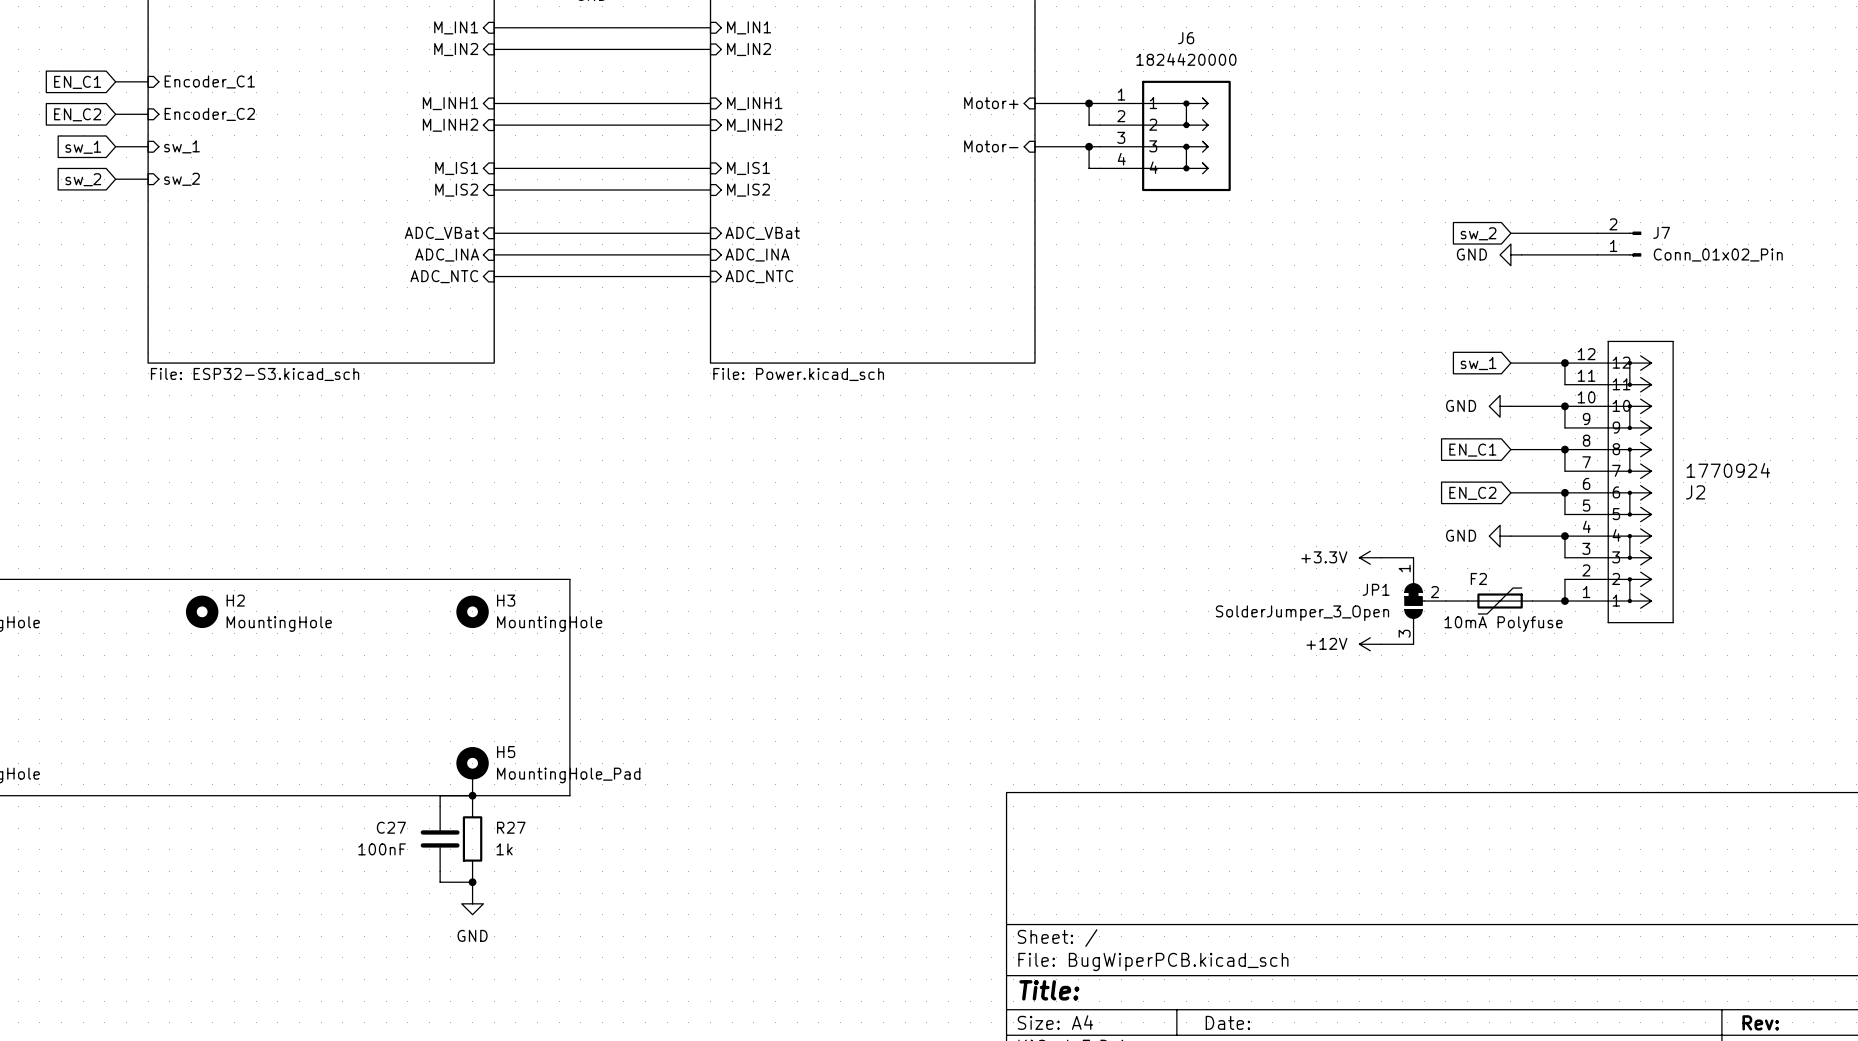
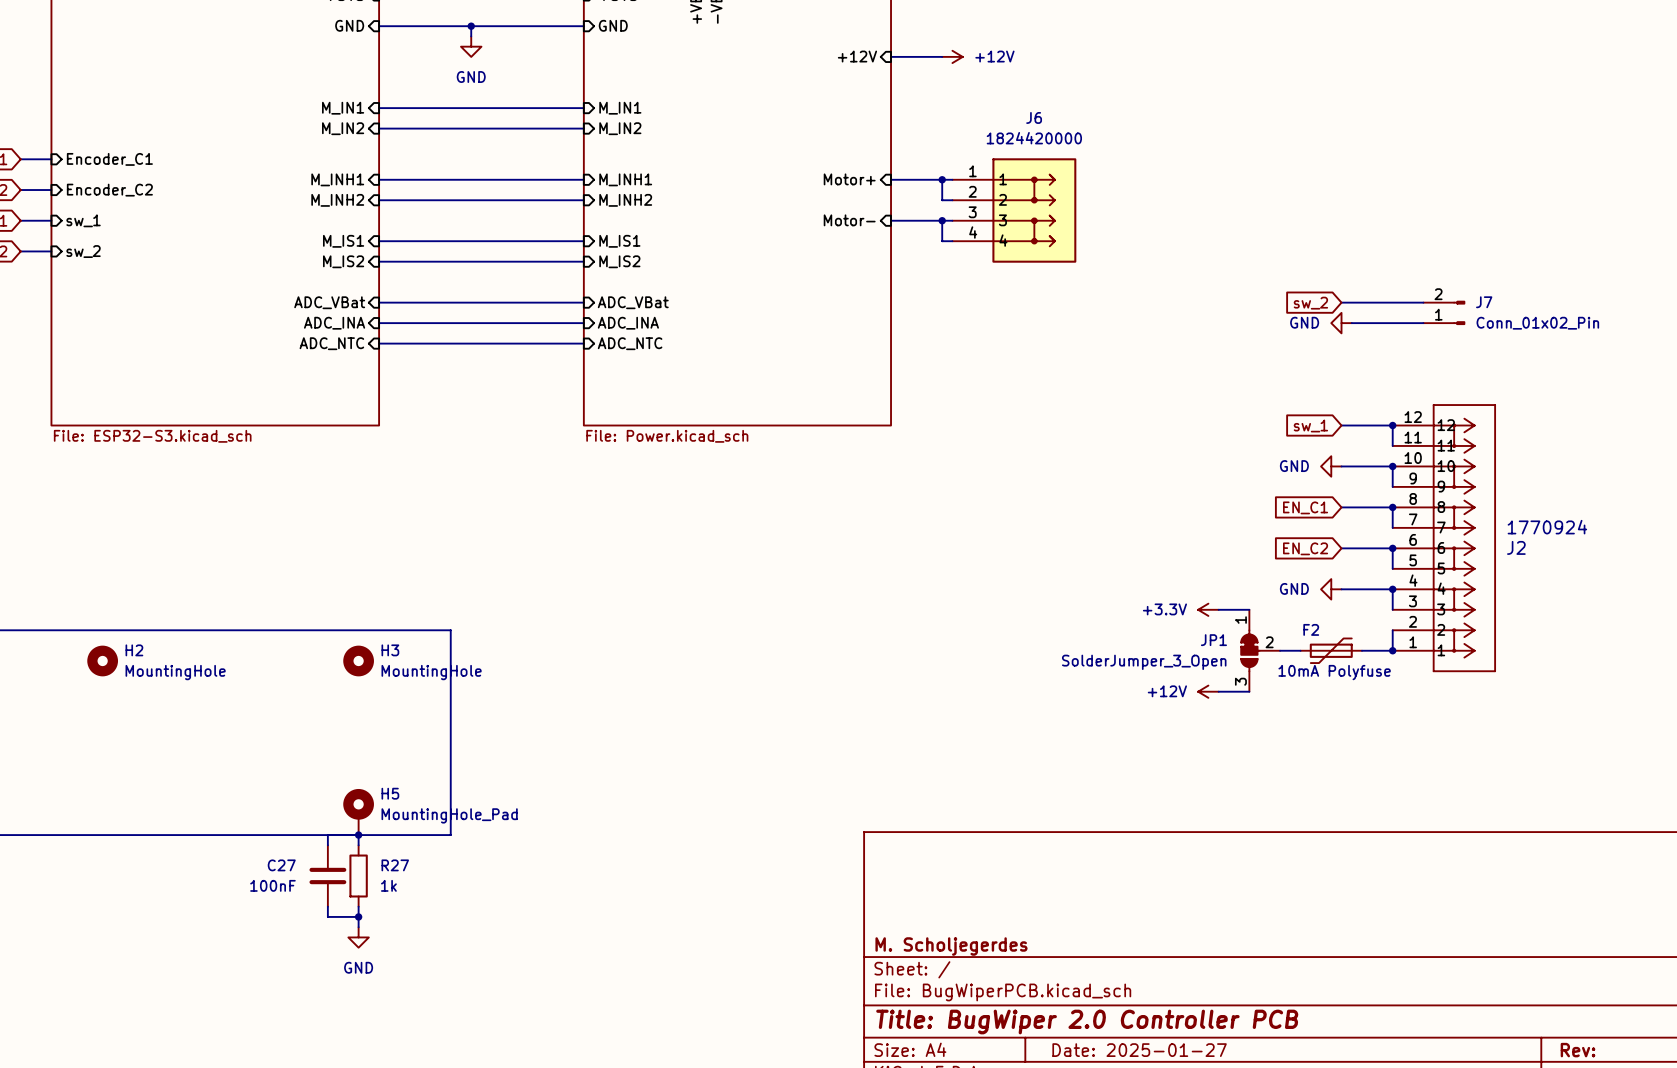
title block: none -> M. Scholjegerdes (951, 946)
title block: Title: (1049, 990) -> Title: BugWiper 2.0 Controller PCB (1087, 1022)
title block: Date: (1227, 1022) -> Date: 2025-01-27 (1139, 1050)

